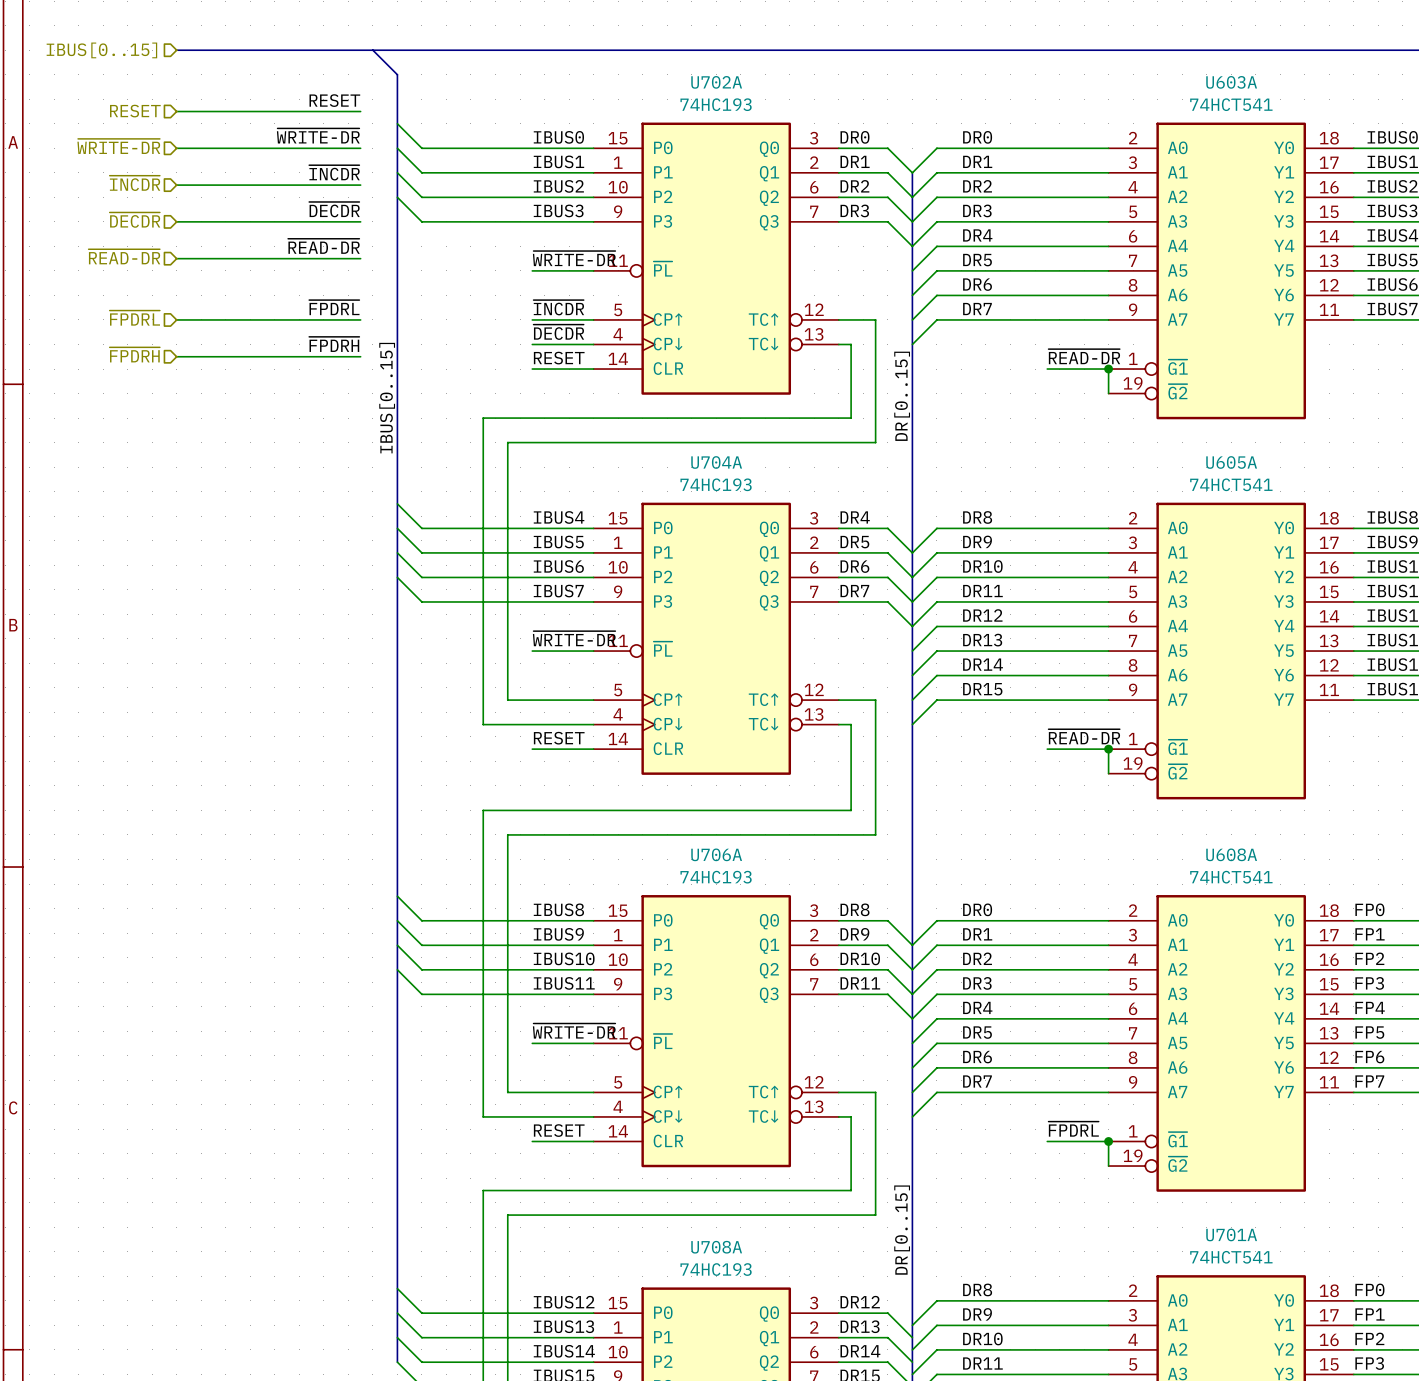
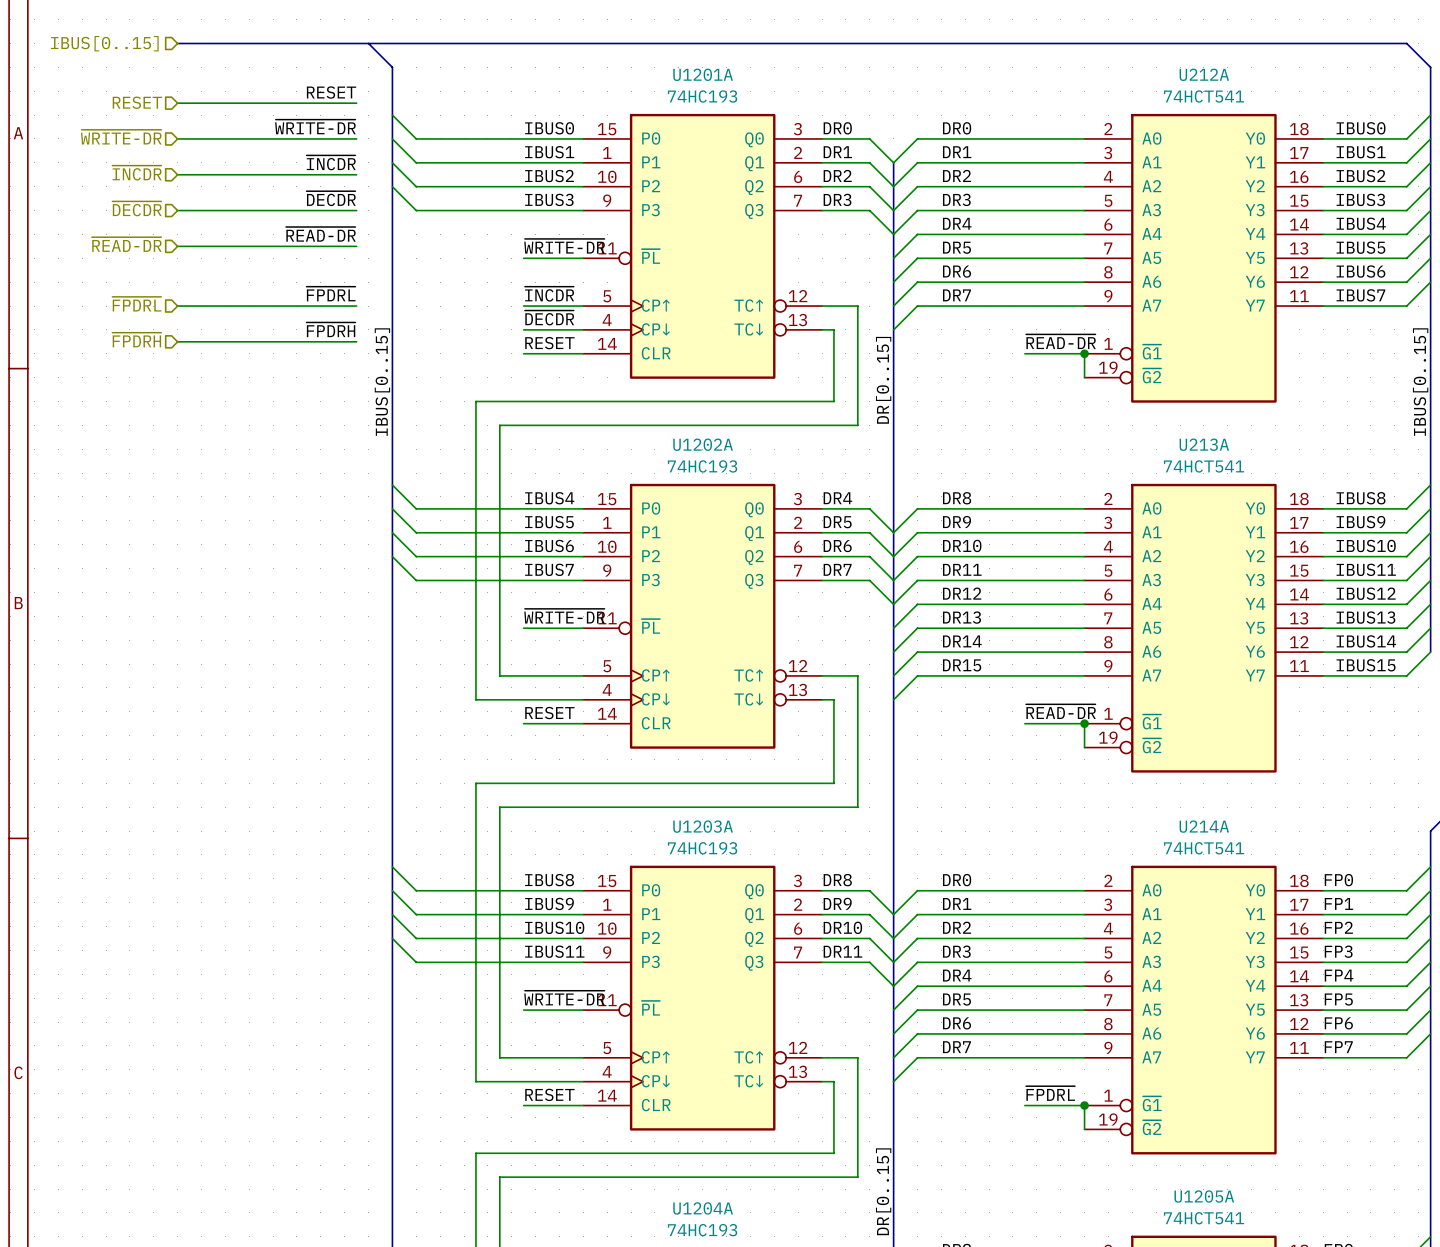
U702A name: U702A (716, 82) -> U1201A (703, 74)
U603A name: U603A (1231, 82) -> U212A (1204, 74)
U704A name: U704A (716, 462) -> U1202A (703, 444)
U605A name: U605A (1231, 462) -> U213A (1204, 444)
U706A name: U706A (716, 854) -> U1203A (703, 826)
U608A name: U608A (1231, 854) -> U214A (1204, 826)
U701A name: U701A (1231, 1234) -> U1205A (1204, 1196)
U708A name: U708A (716, 1247) -> U1204A (703, 1208)

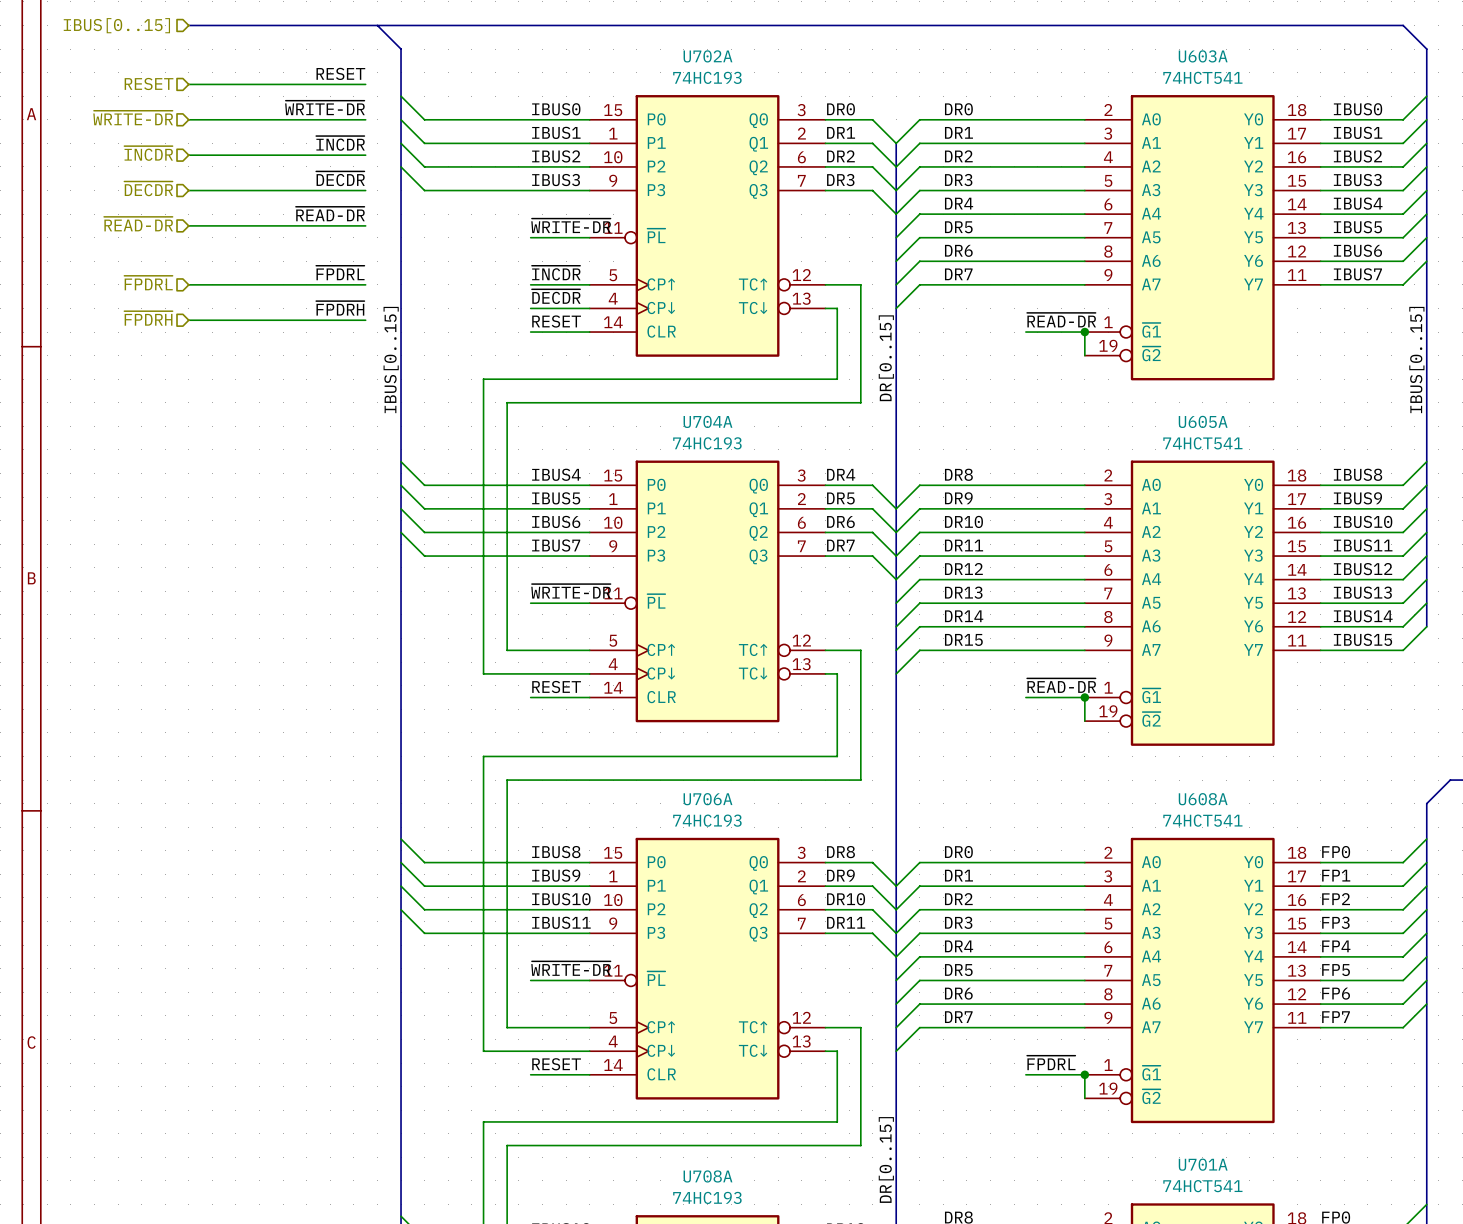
U1201A name: U1201A (703, 74) -> U702A (707, 56)
U212A name: U212A (1204, 74) -> U603A (1203, 56)
U1202A name: U1202A (703, 444) -> U704A (707, 421)
U213A name: U213A (1204, 444) -> U605A (1203, 421)
U1203A name: U1203A (703, 826) -> U706A (707, 799)
U214A name: U214A (1204, 826) -> U608A (1203, 799)
U1205A name: U1205A (1204, 1196) -> U701A (1203, 1164)
U1204A name: U1204A (703, 1208) -> U708A (707, 1176)

